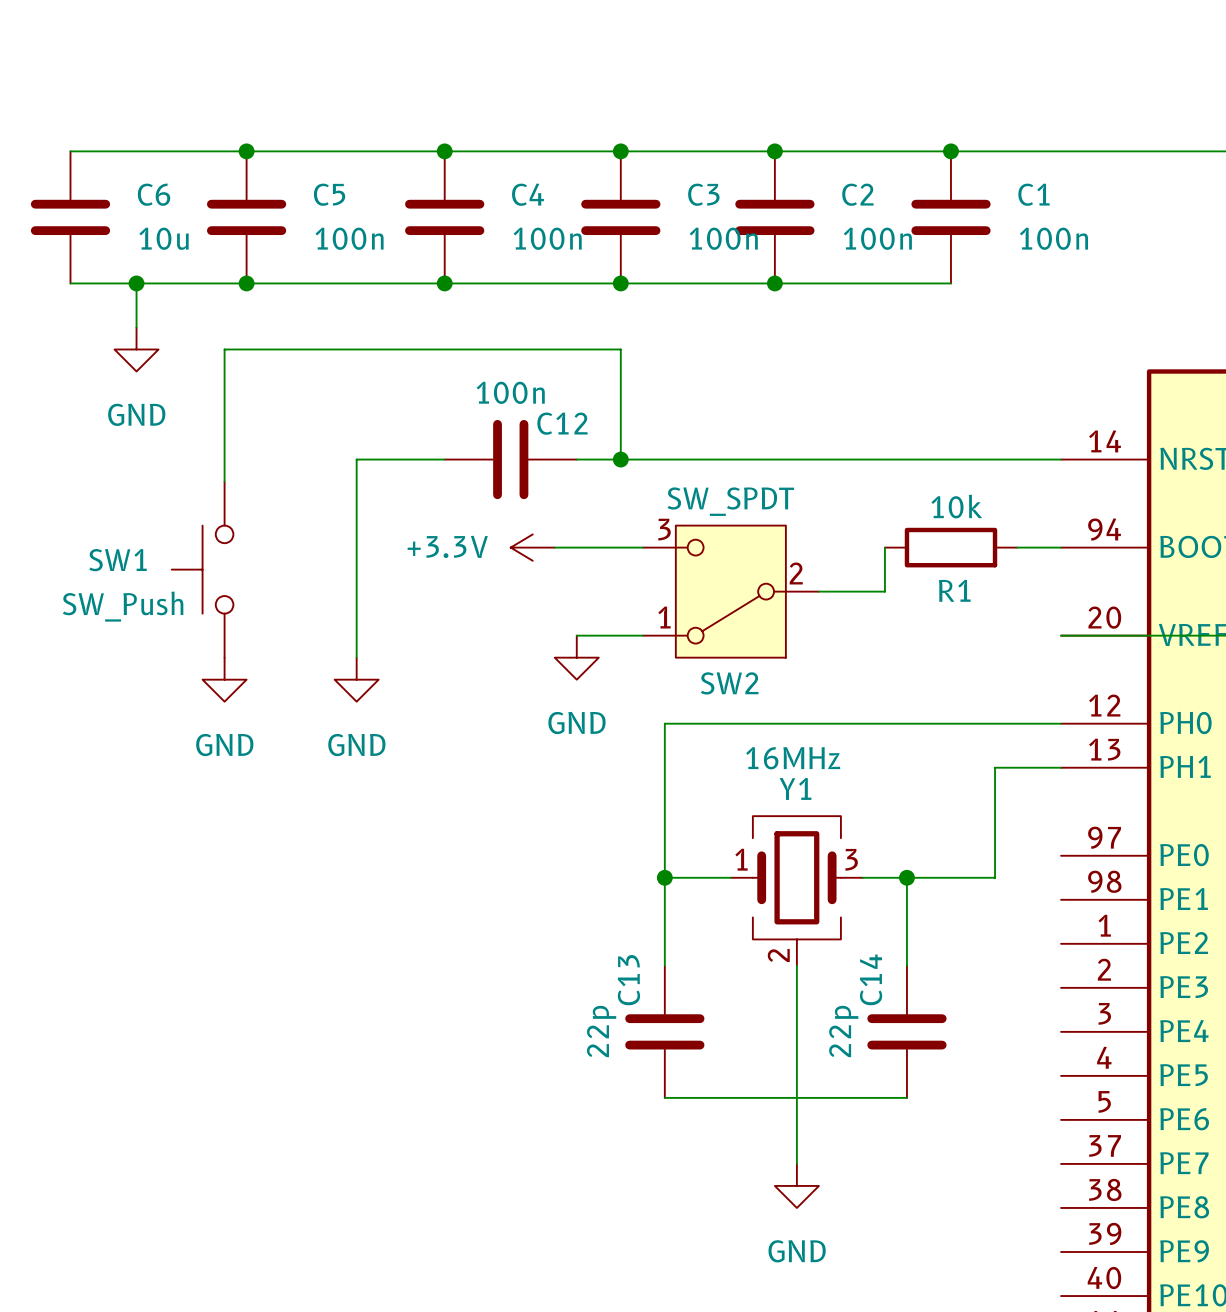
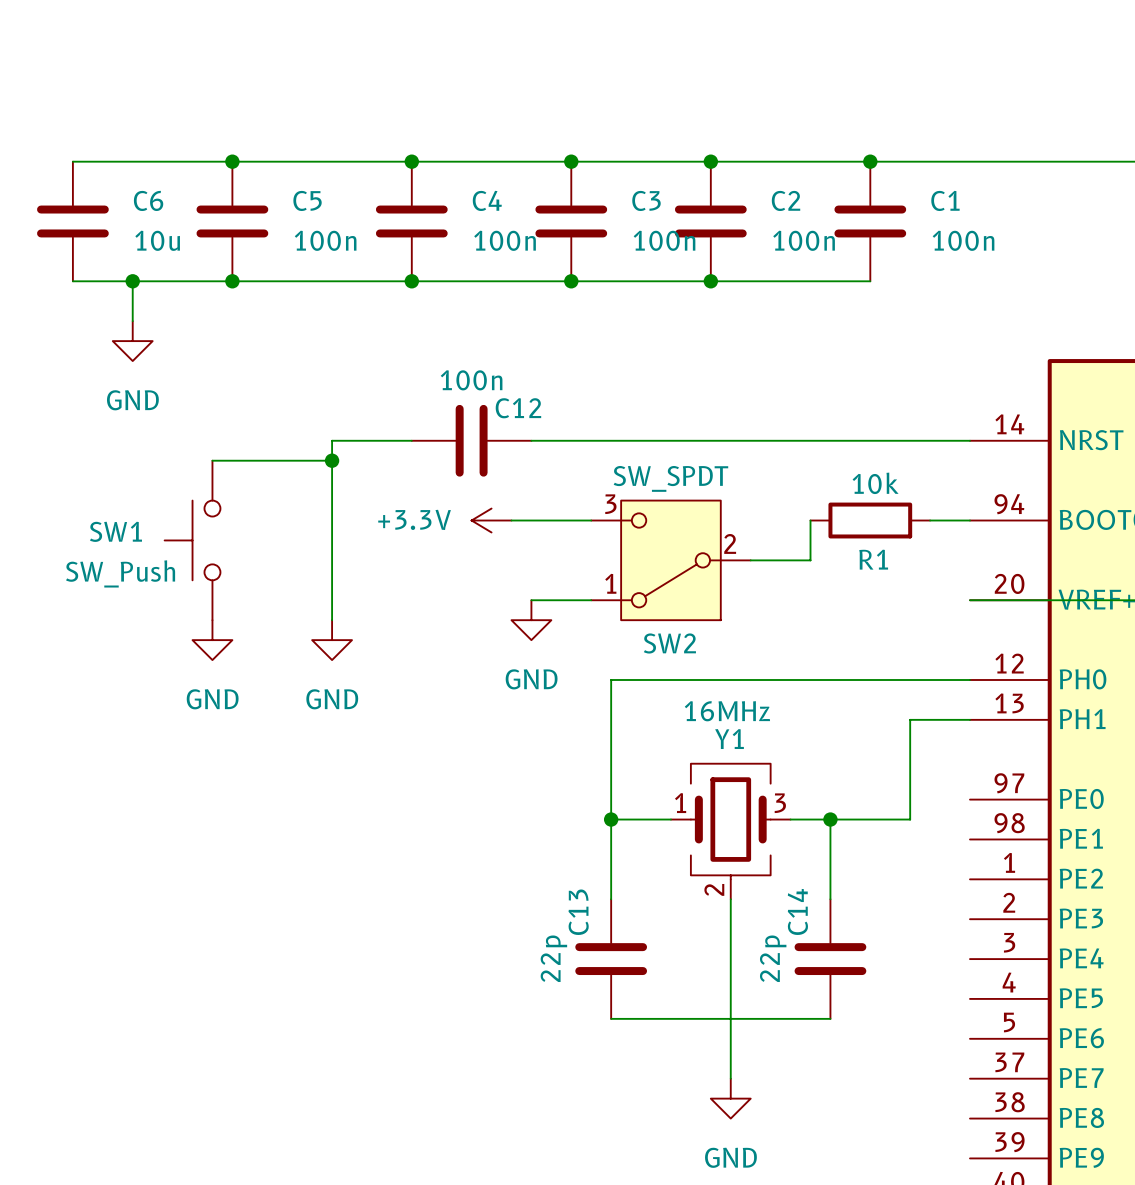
wire: (620, 459) (620, 349) (224, 349) (224, 481) -> (332, 460) (212, 460)
junction: (620, 459) -> none
junction: none -> (332, 460)

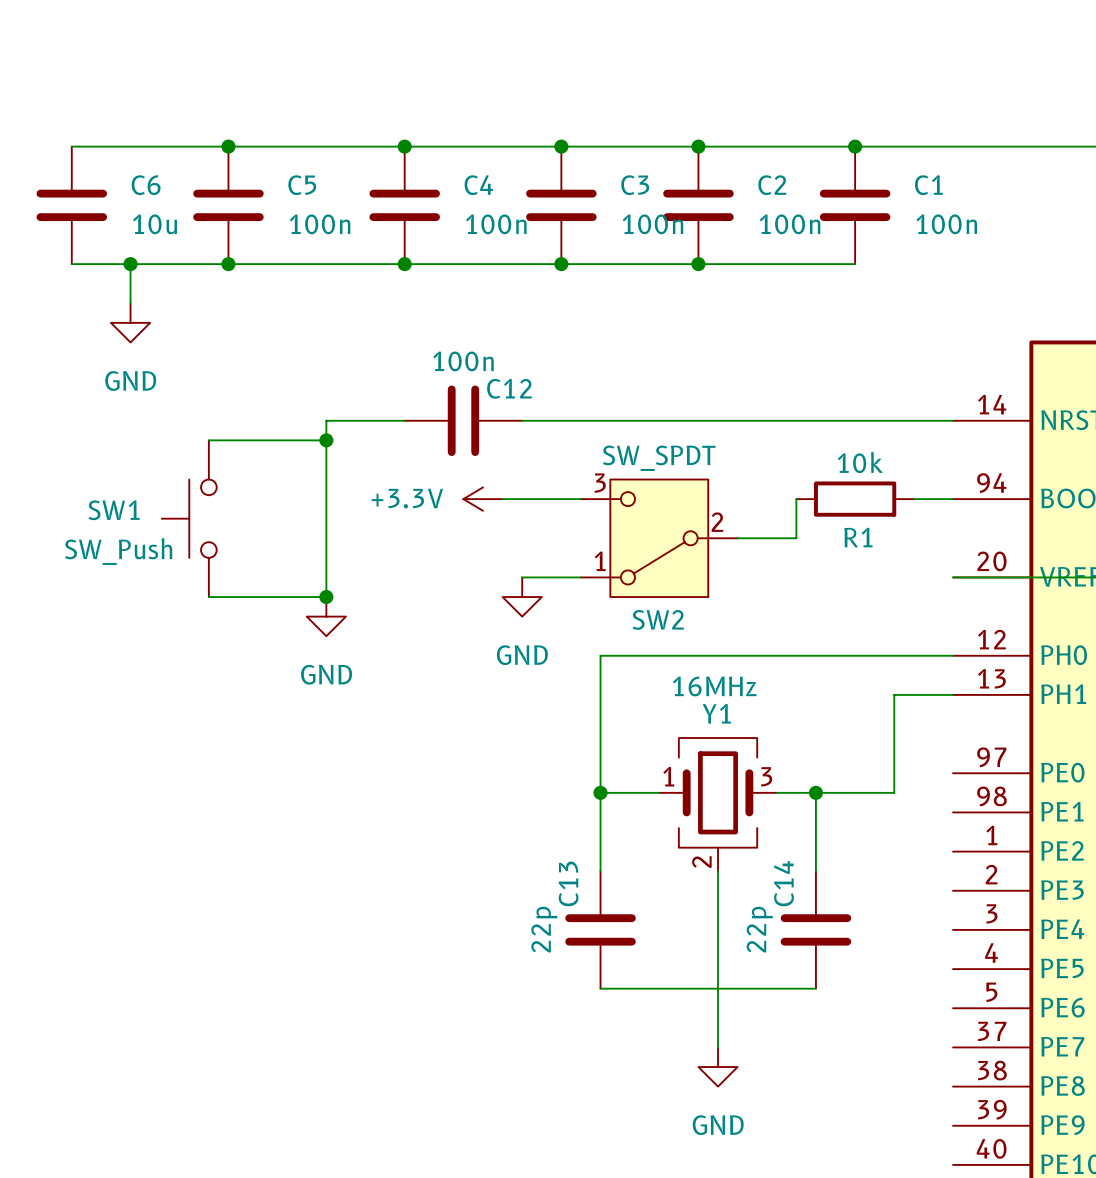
wire: none -> (208, 597) (326, 597)
junction: none -> (326, 597)
power symbol: GND (212, 640) -> none

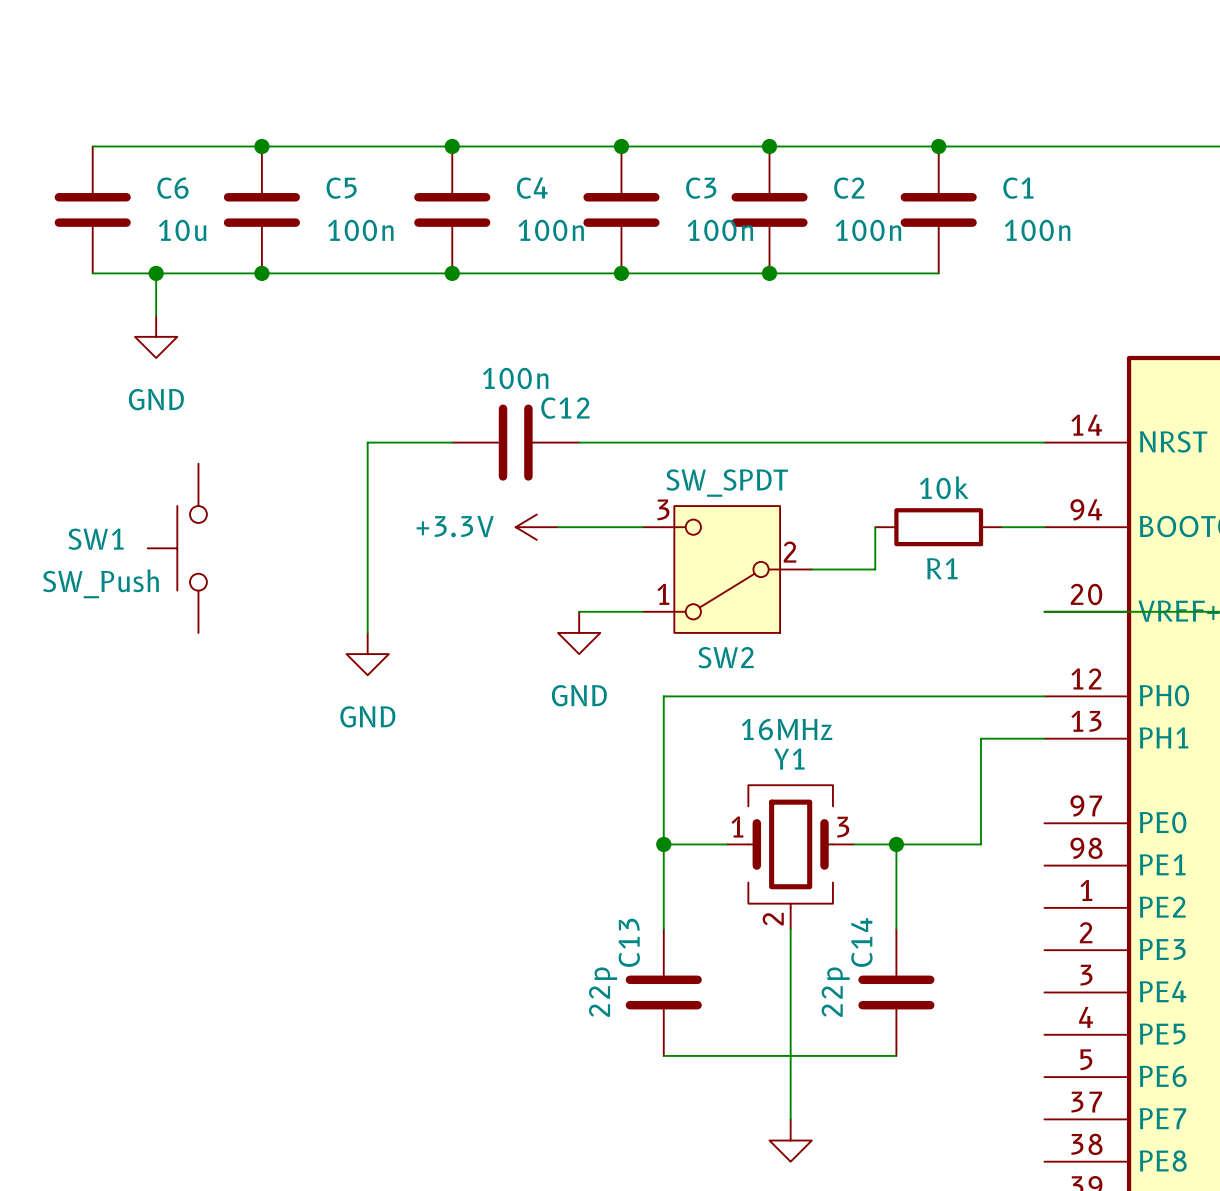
wire: (208, 440) (326, 440) -> none
junction: (326, 440) -> none
SW1 position: (189, 518) -> (177, 548)
wire: (208, 597) (326, 597) -> none
junction: (326, 597) -> none

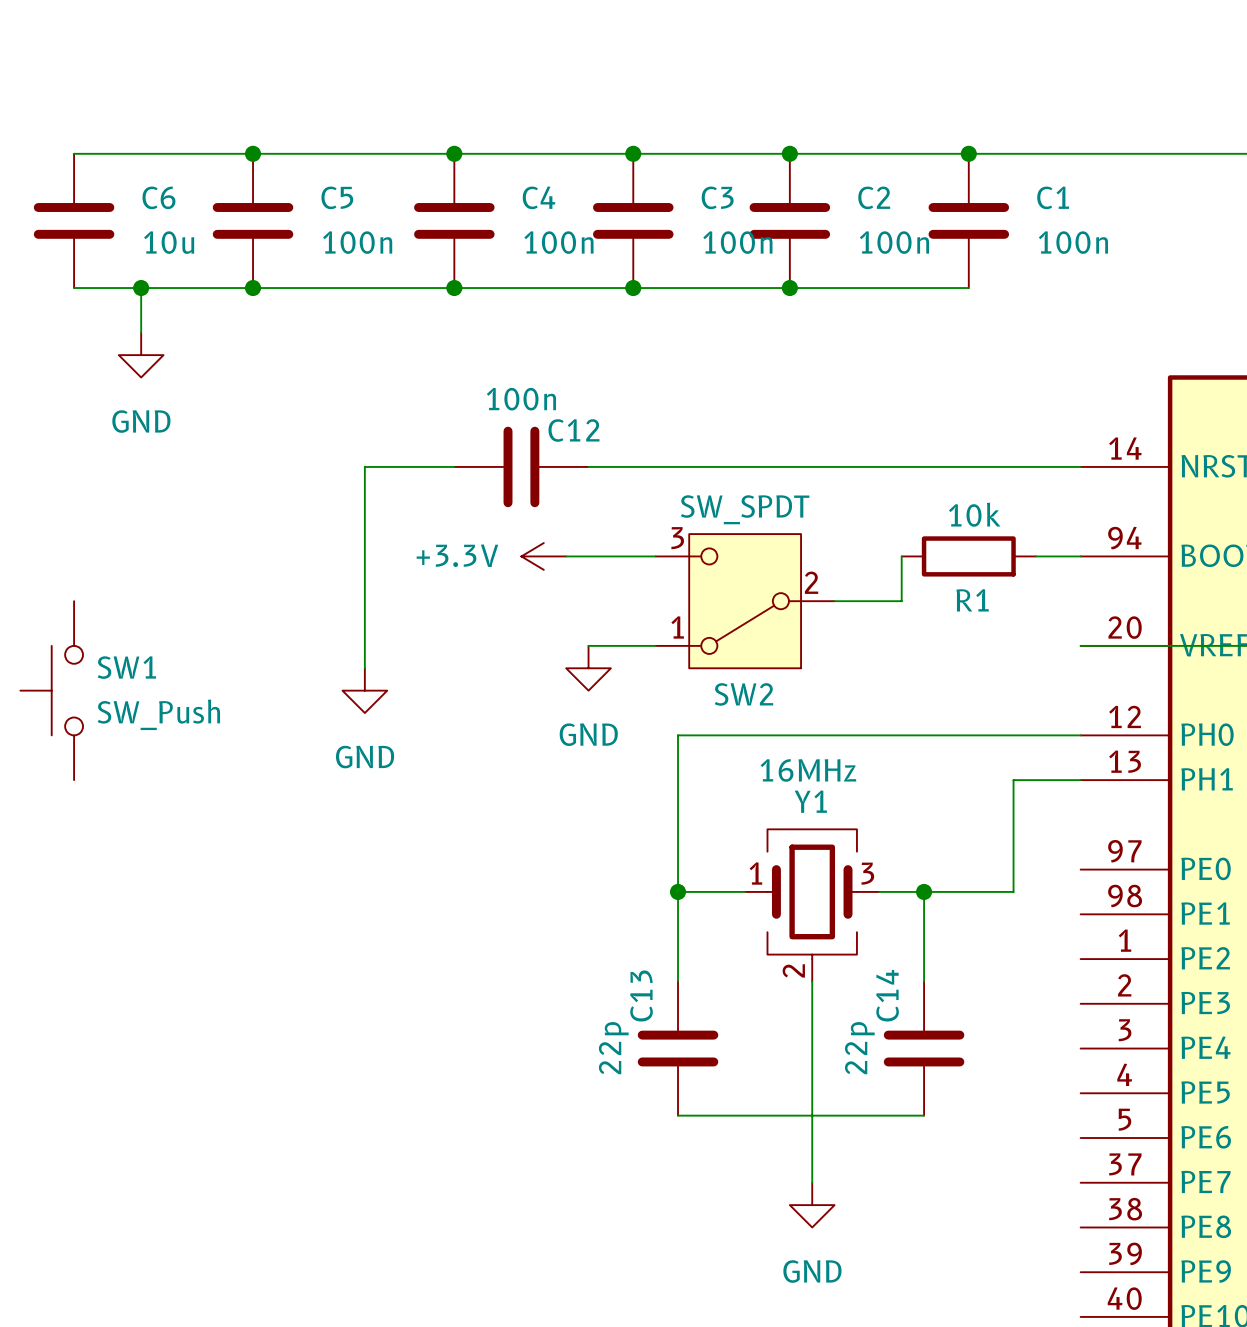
SW1 name position: SW1 (96, 539) -> SW1 (126, 667)
SW1 position: (177, 548) -> (51, 690)
SW1 value position: SW_Push (100, 583) -> SW_Push (158, 714)

